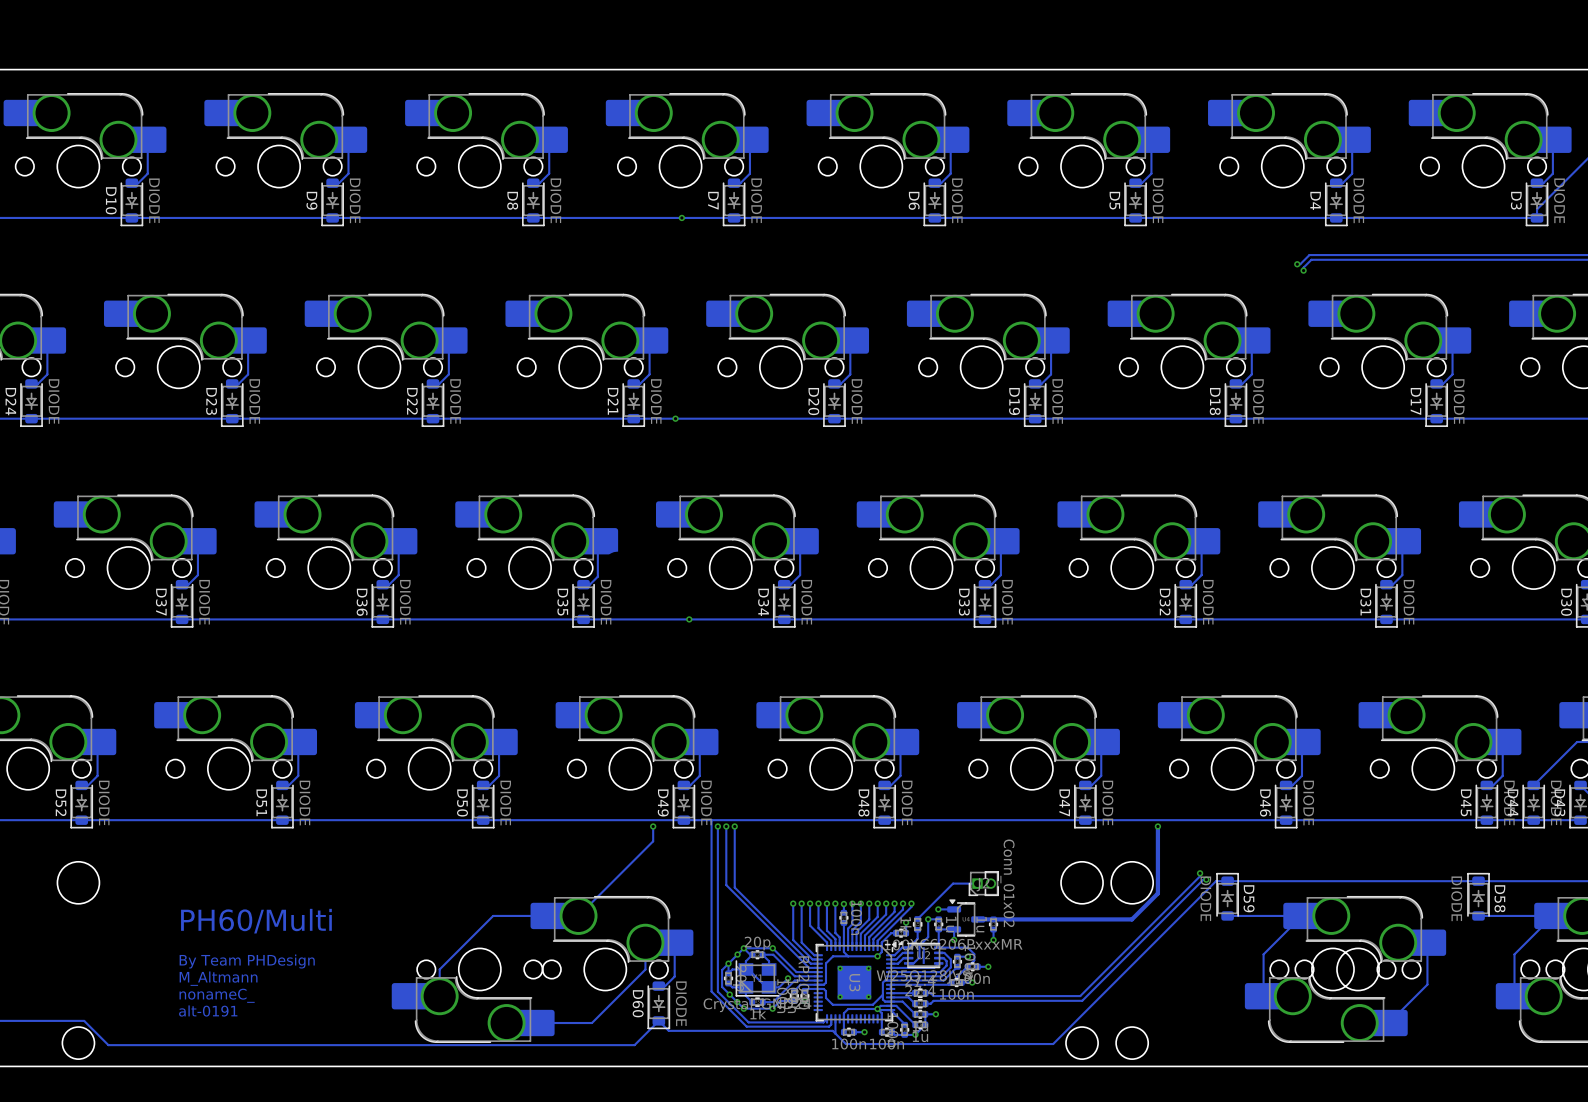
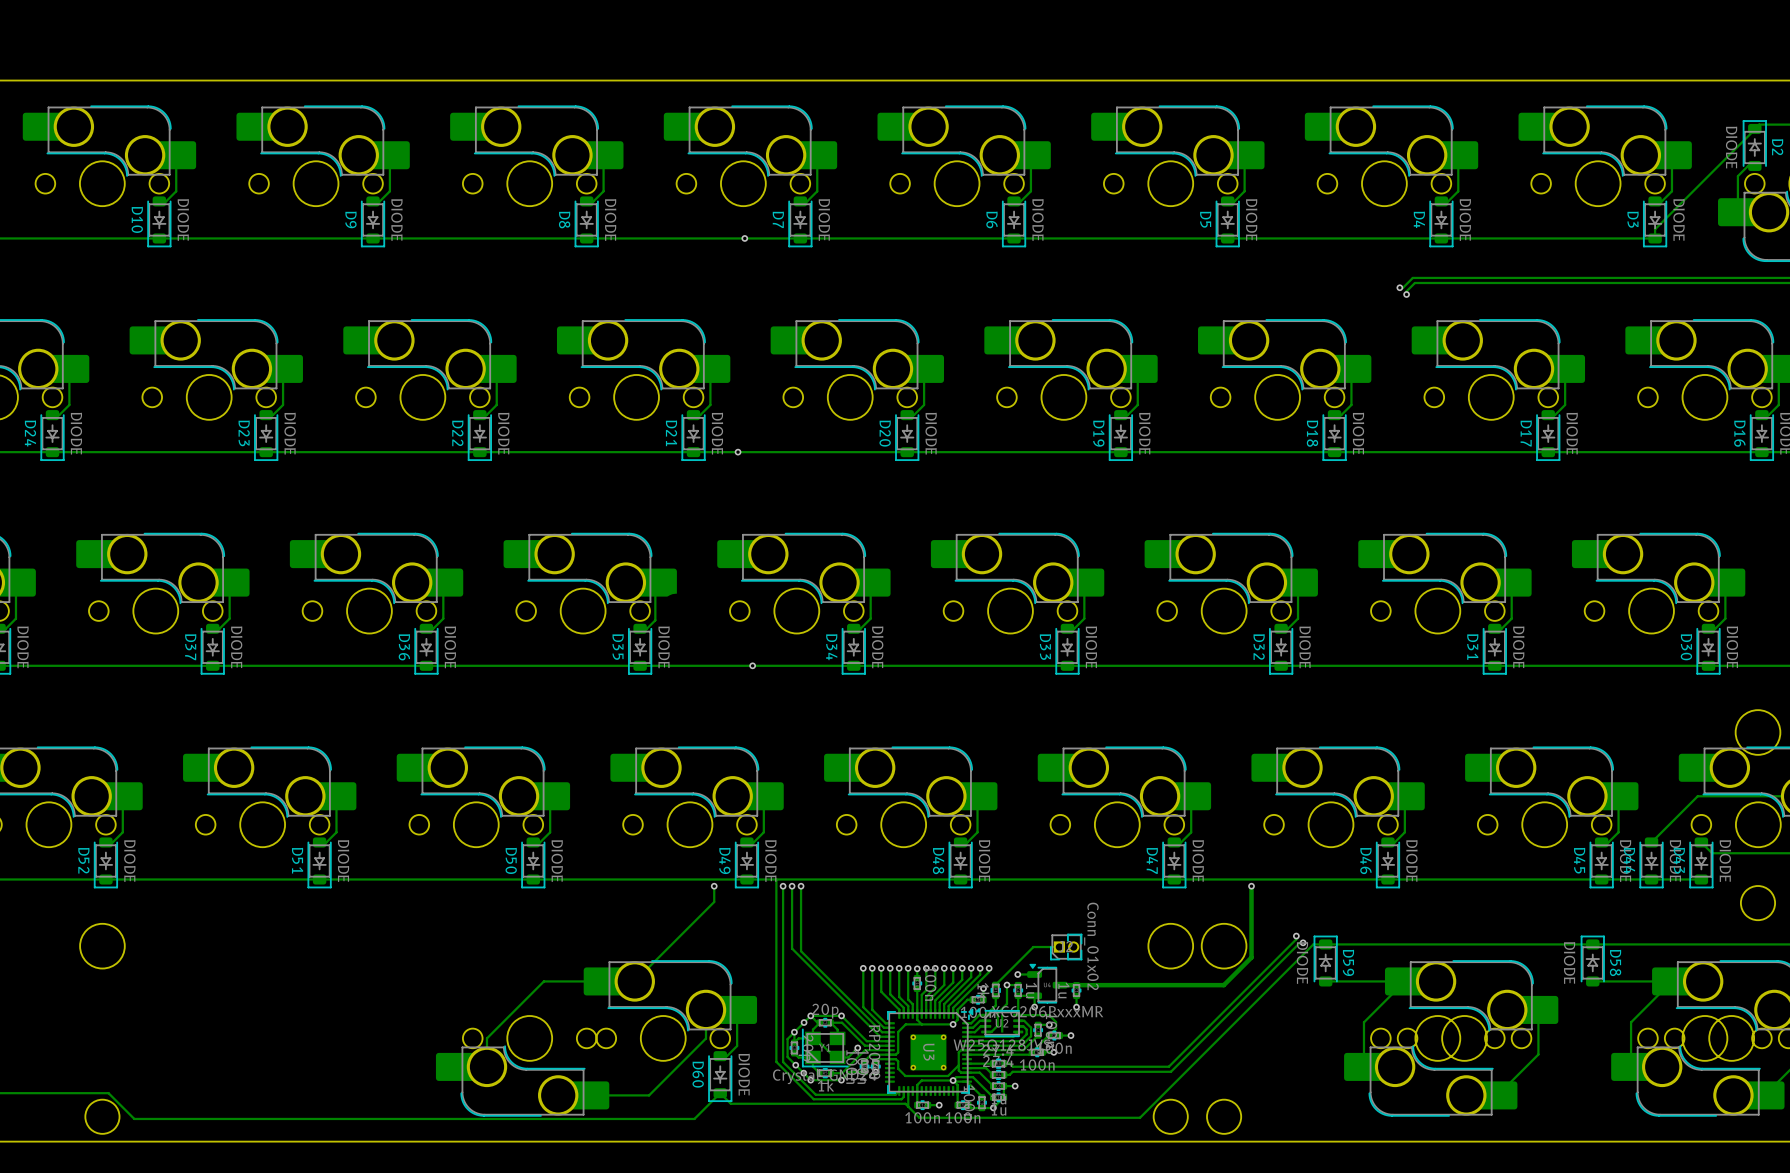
text: PH60/Multi (256, 921) -> none
text: By Team PHDesign (247, 961) -> none
text: M_Altmann (218, 978) -> none
text: nonameC_ (217, 995) -> none
text: alt-0191 (208, 1011) -> none

